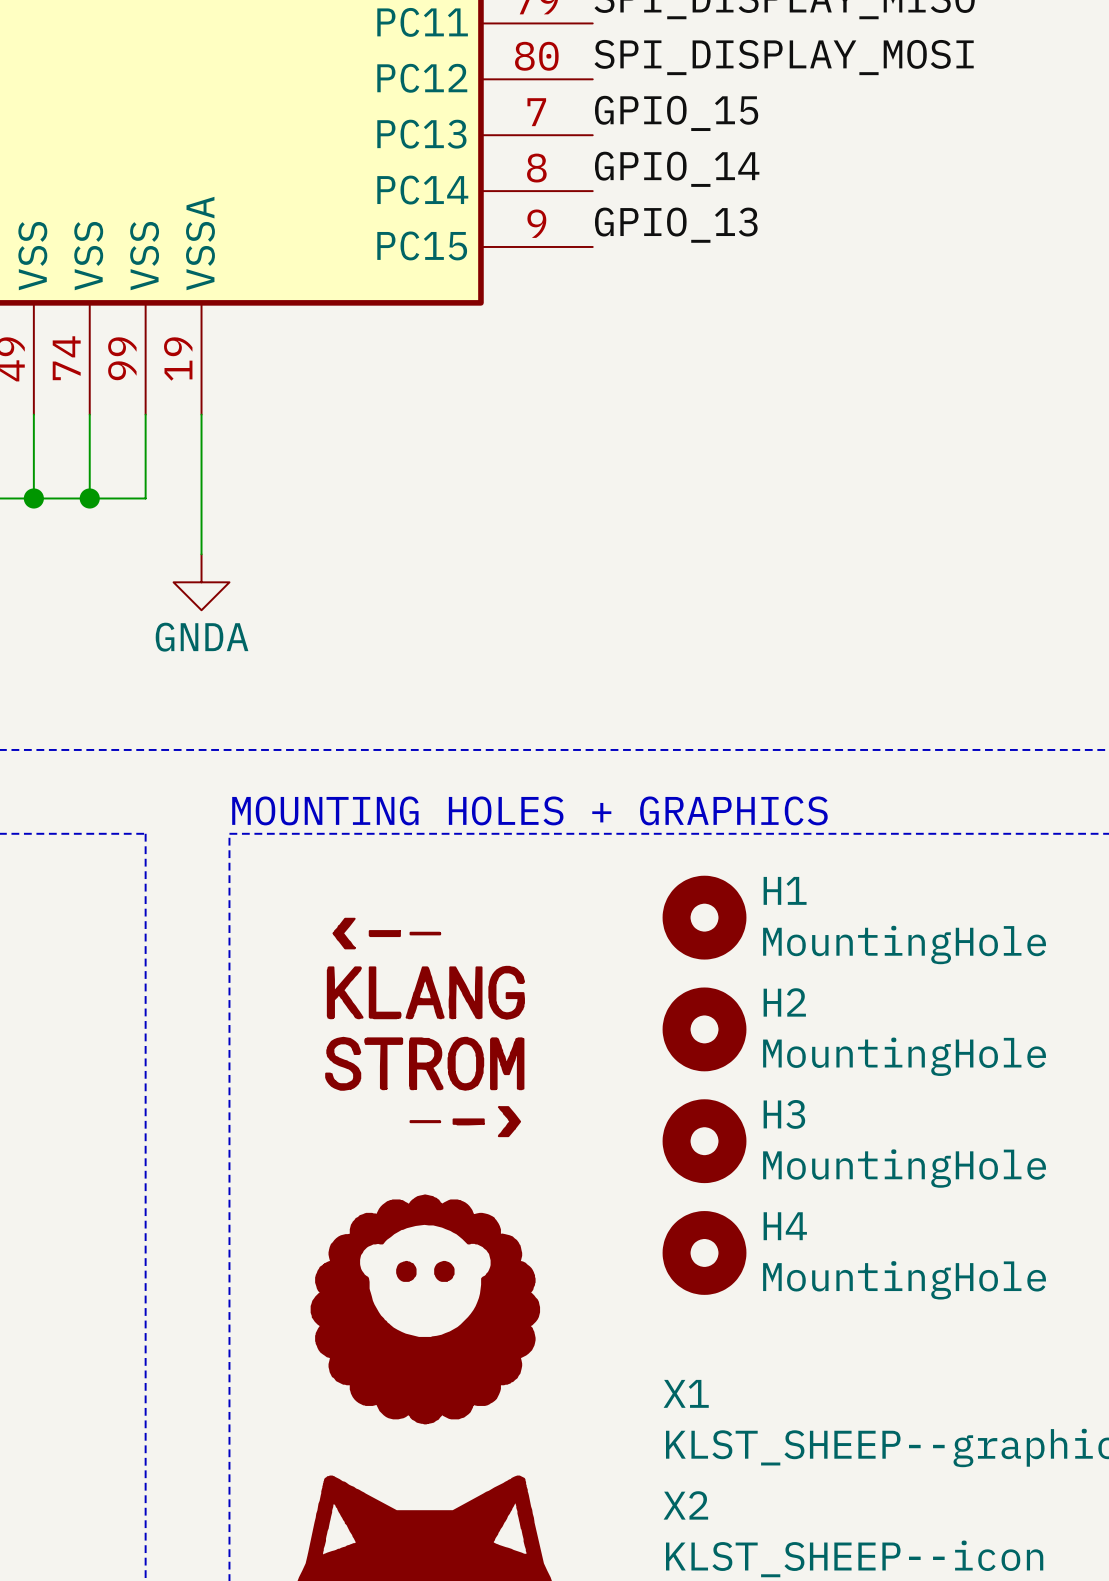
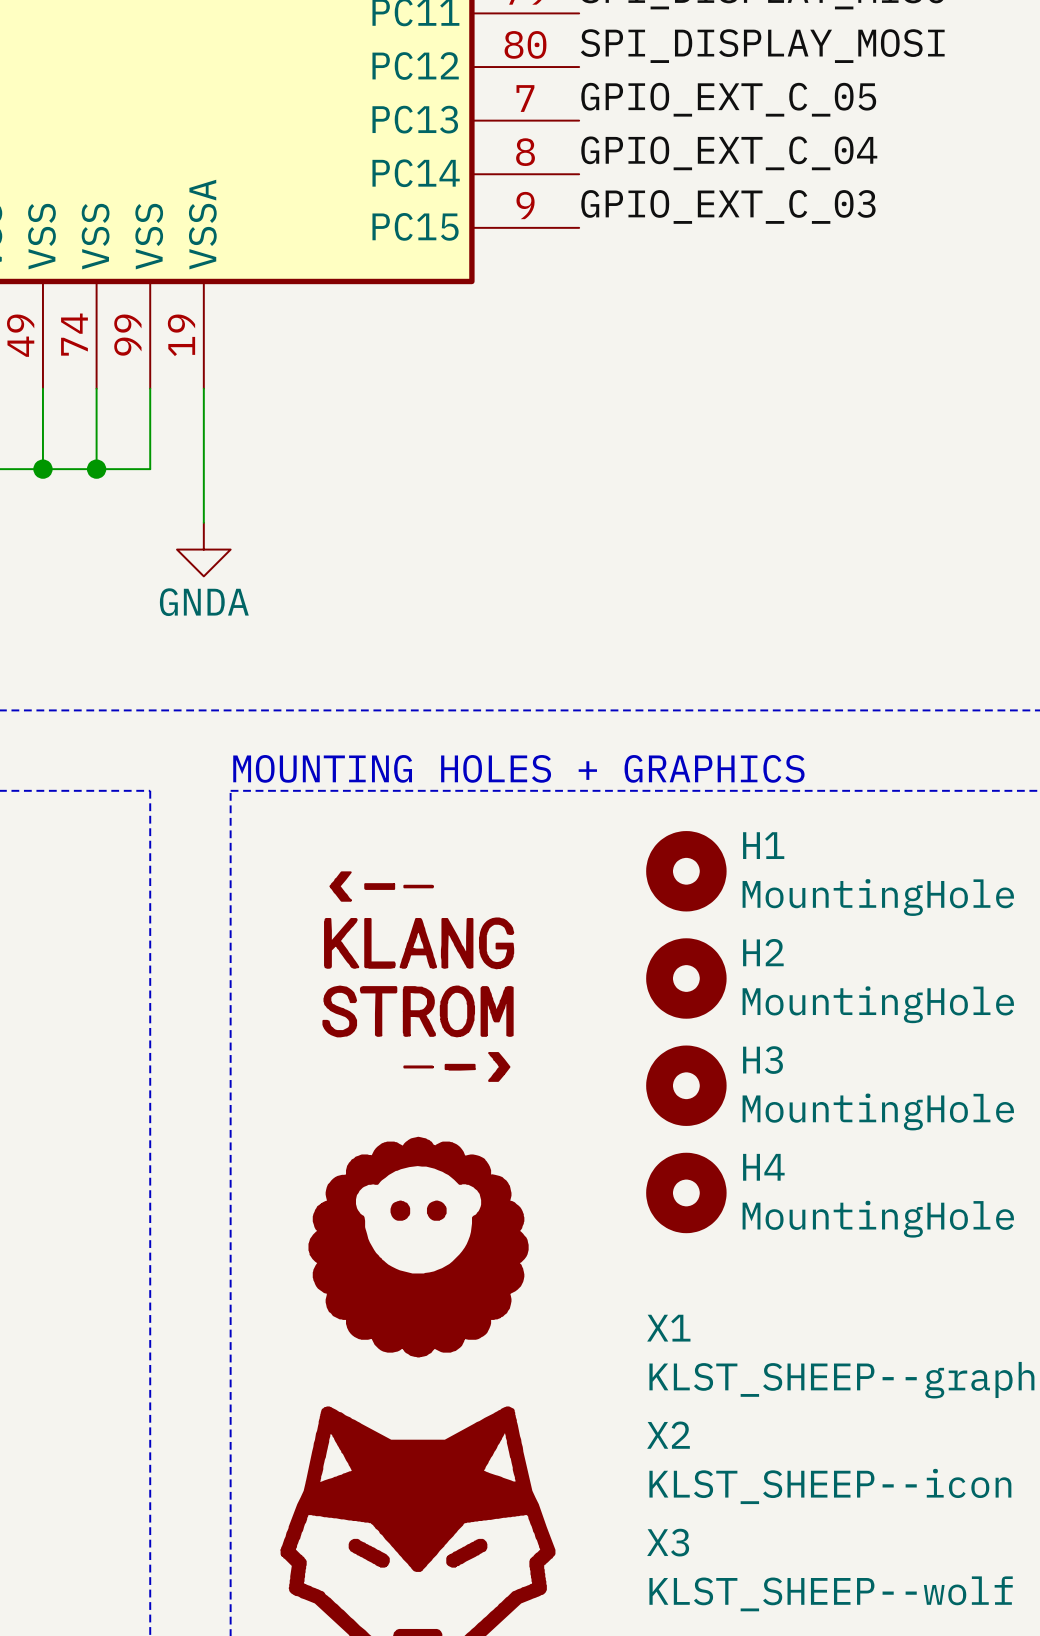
label: GPIO_15 (676, 113) -> GPIO_EXT_C_05 (728, 99)
label: GPIO_14 (677, 169) -> GPIO_EXT_C_04 (729, 153)
label: GPIO_13 (676, 225) -> GPIO_EXT_C_03 (728, 206)

